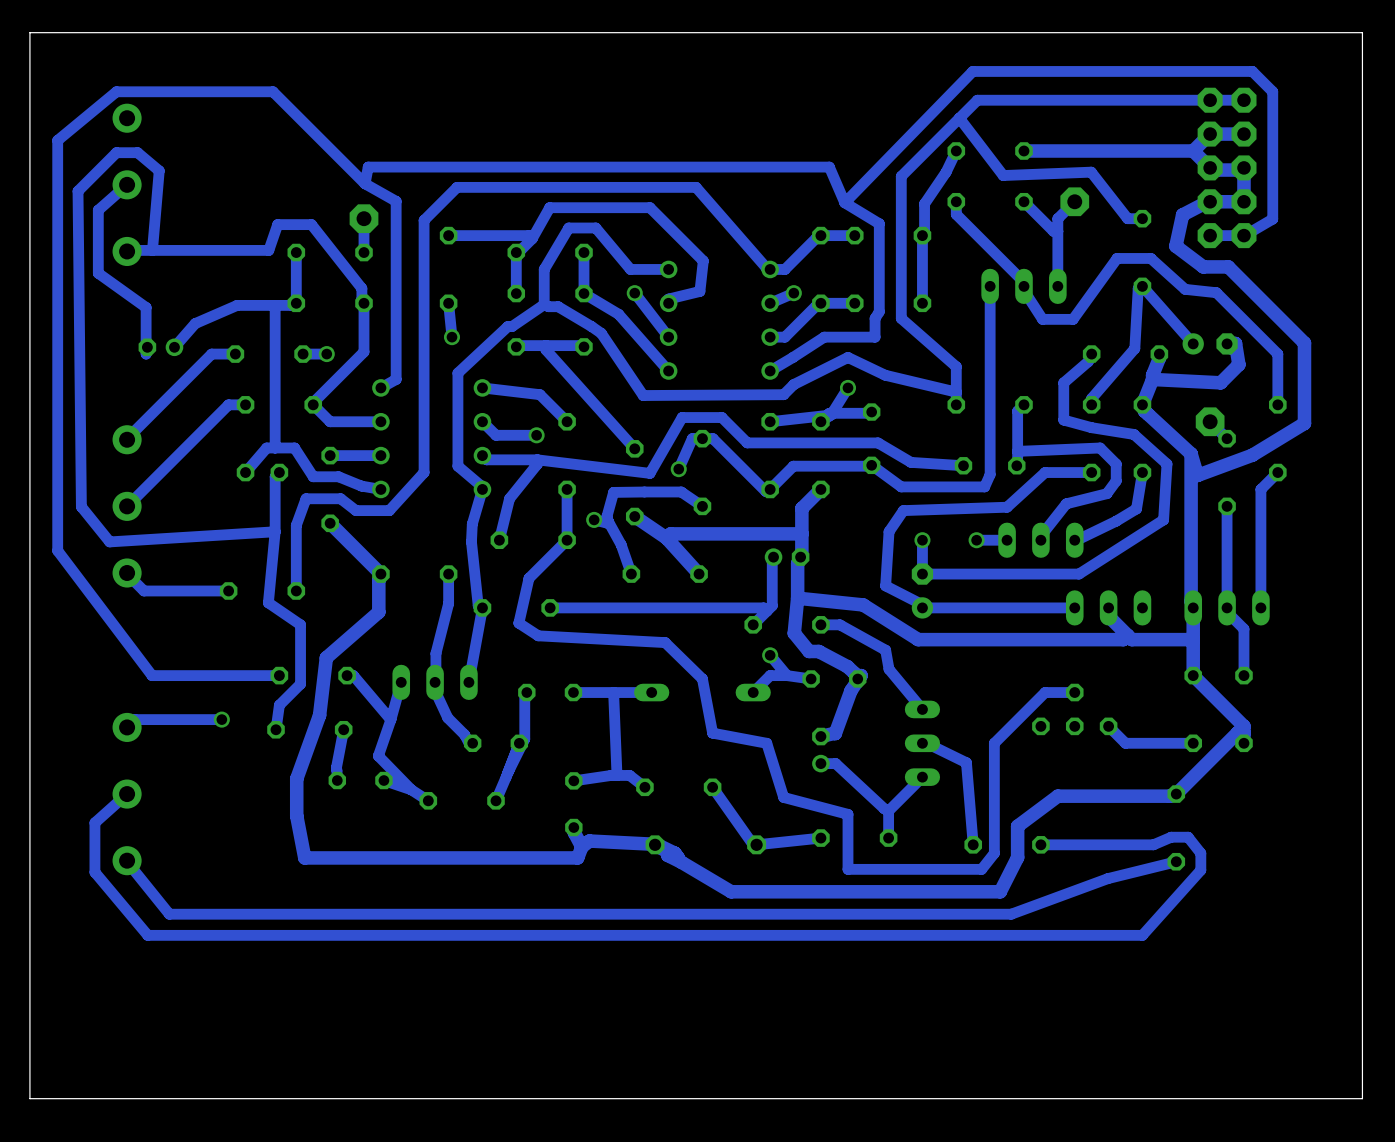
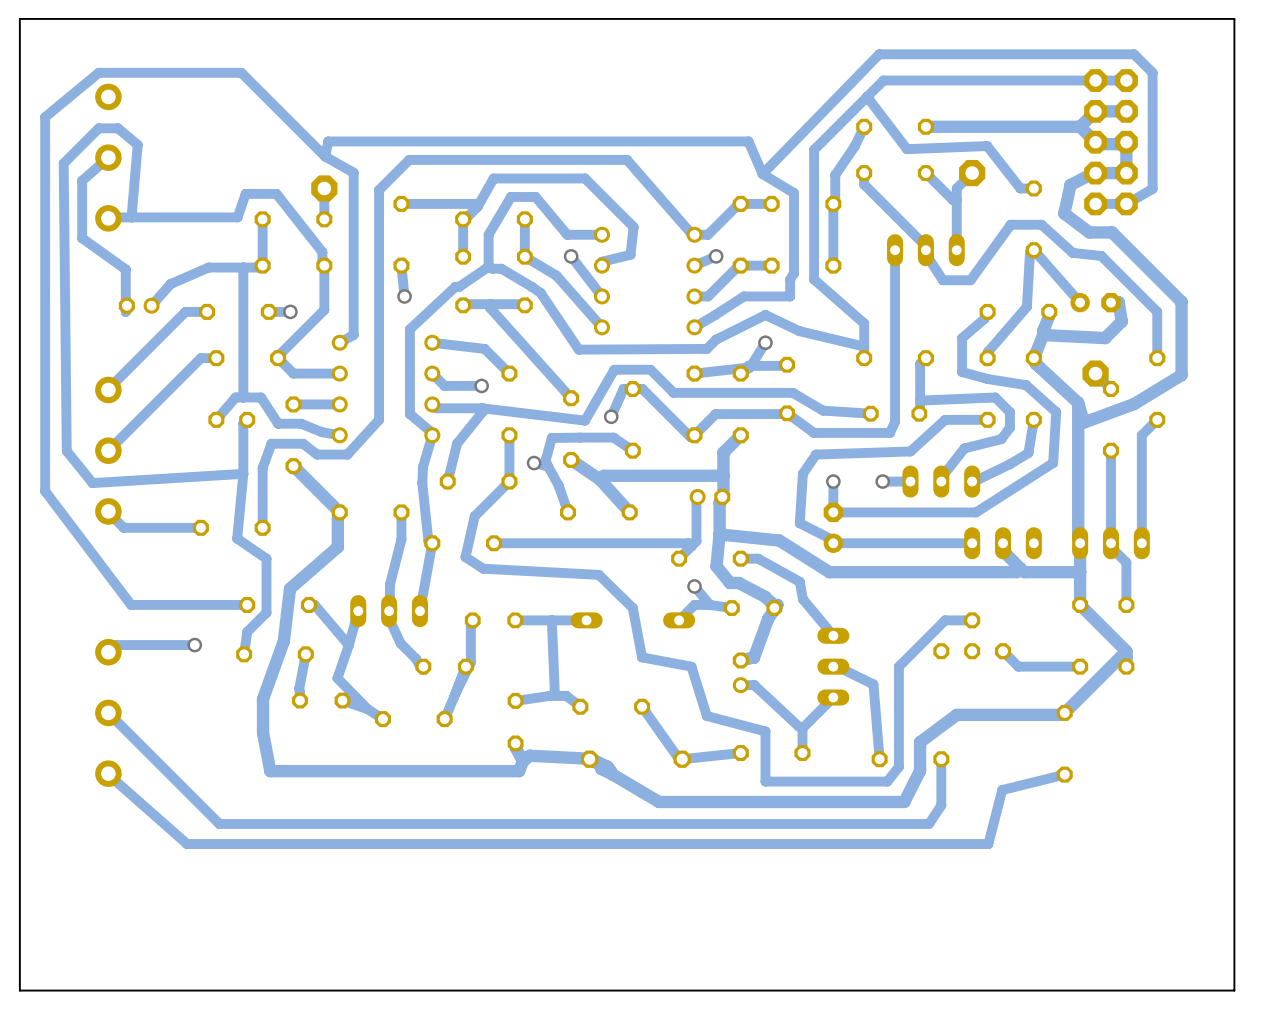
track: (127, 794) (94, 822) (94, 872) (147, 935) (1142, 935) (1200, 870) (1200, 853) (1188, 837) (1171, 837) (1153, 844) (1040, 844) -> (108, 712) (219, 823) (928, 823) (941, 805) (941, 759)
track: (127, 861) (169, 914) (1011, 914) (1107, 878) -> (108, 774) (187, 844) (988, 844) (1002, 790)

